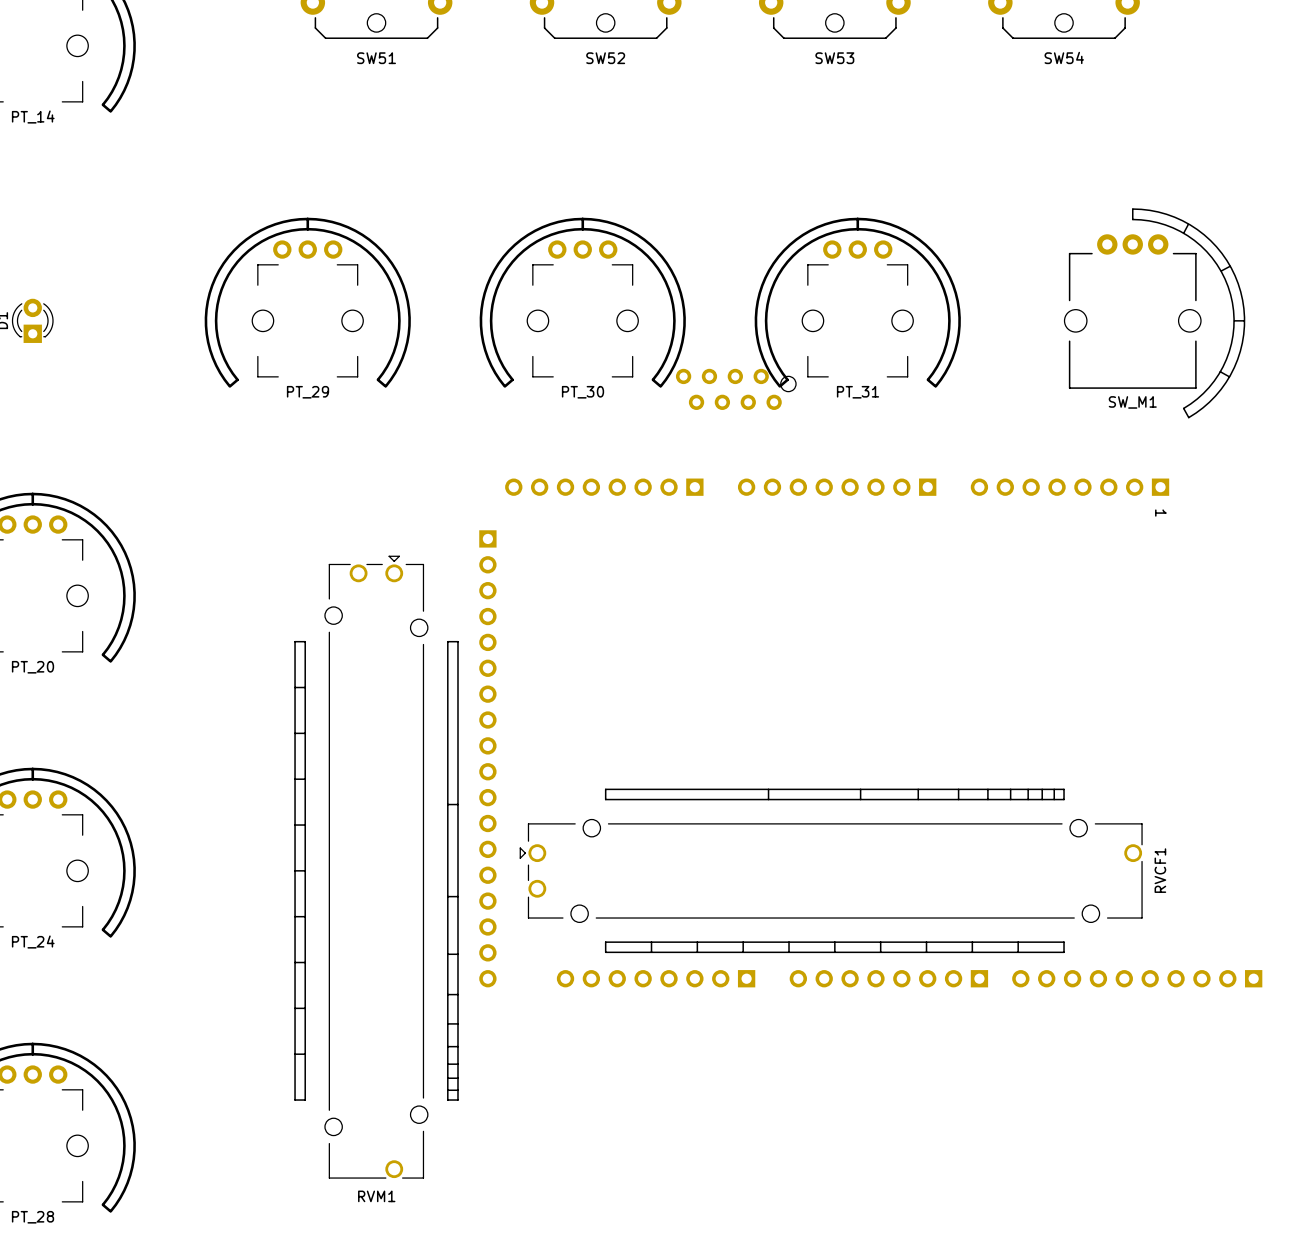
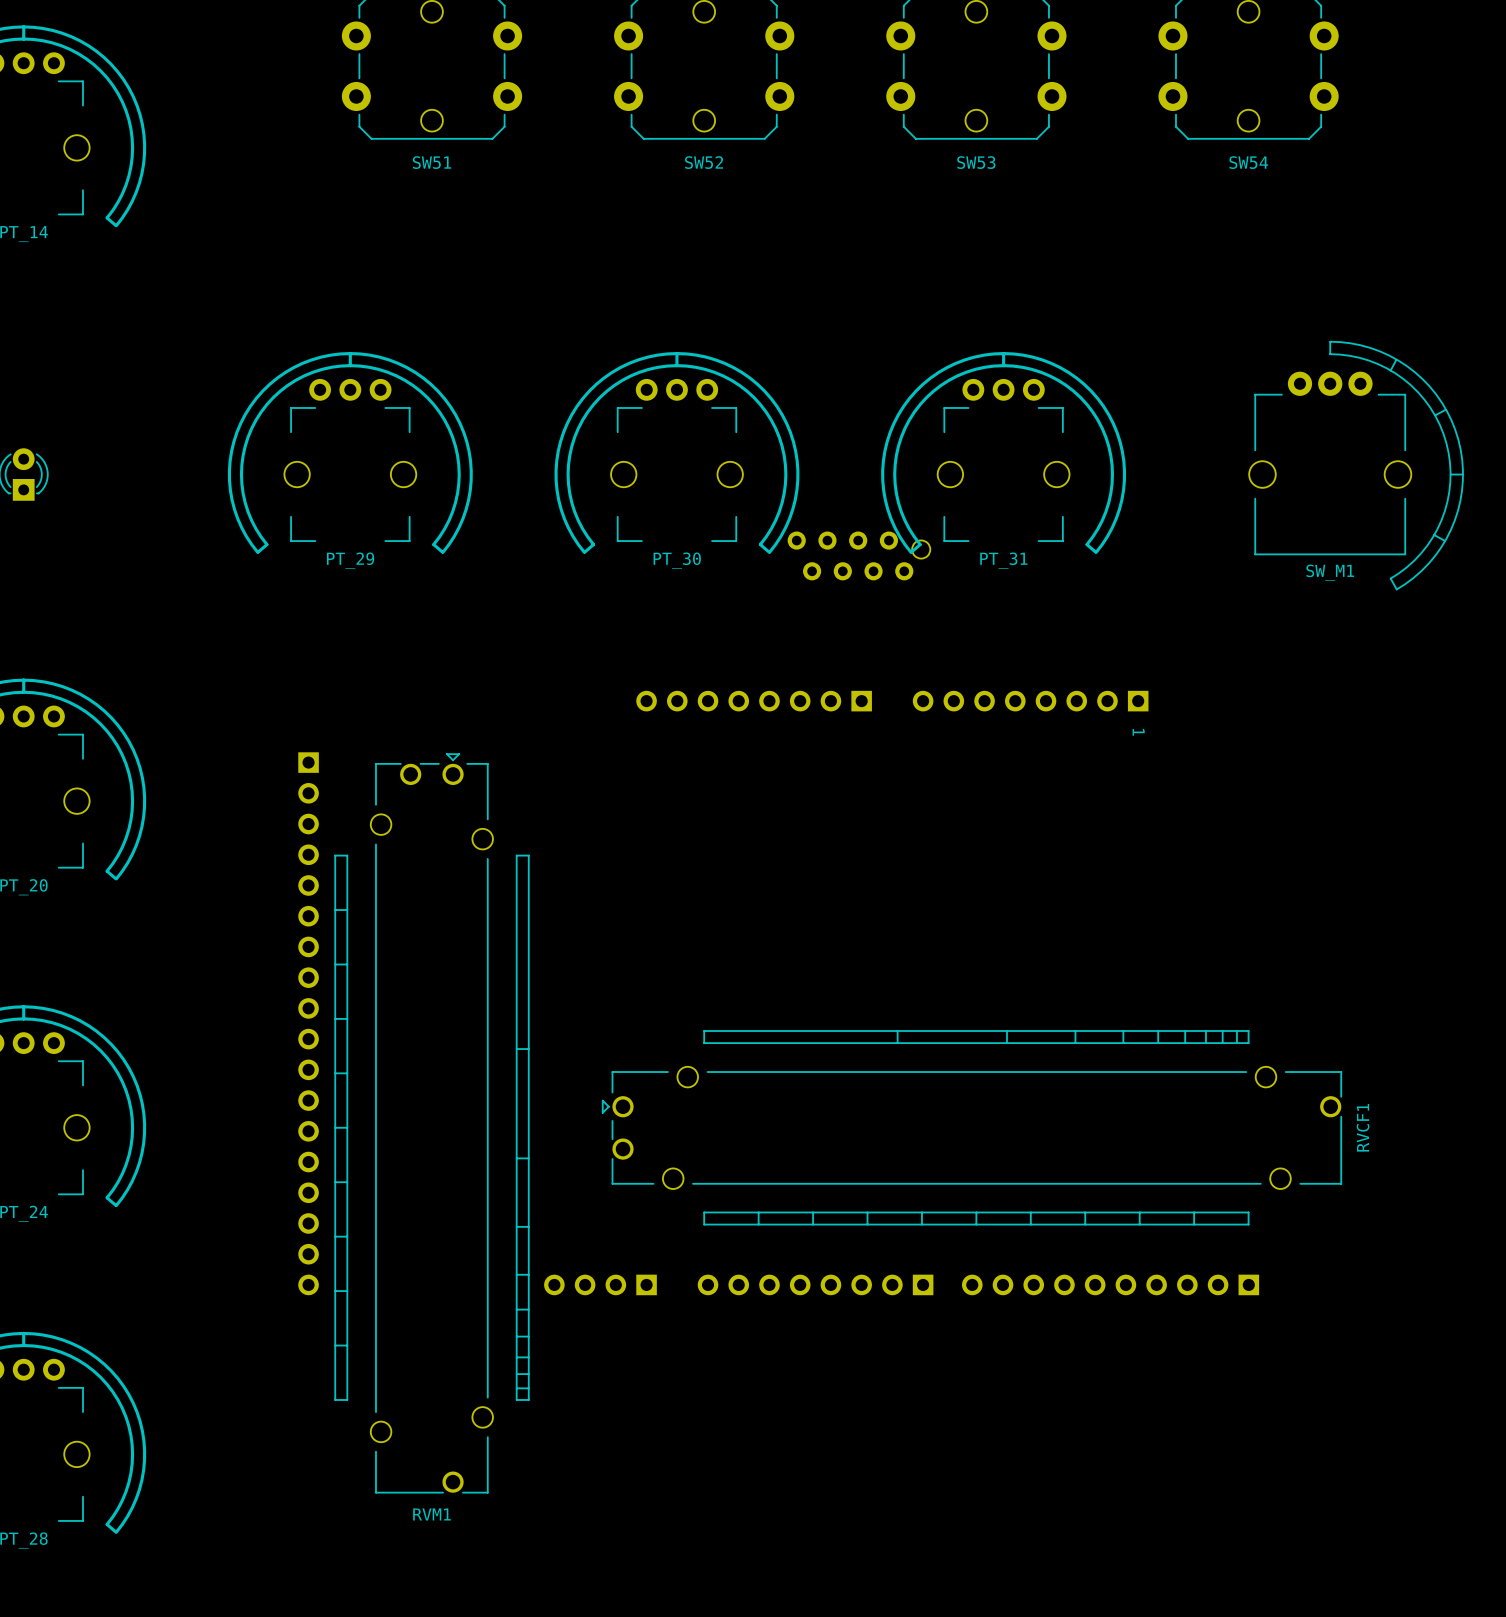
part position: (604, 487) -> (754, 701)
part position: (837, 487) -> (1030, 701)
part: (1069, 487) -> none
text position: 1 (1160, 513) -> 1 (1138, 732)
part position: (487, 758) -> (308, 1023)
part position: (656, 978) -> (815, 1284)
part: (888, 978) -> none
part position: (1137, 978) -> (1110, 1284)
part: none -> (600, 1284)

